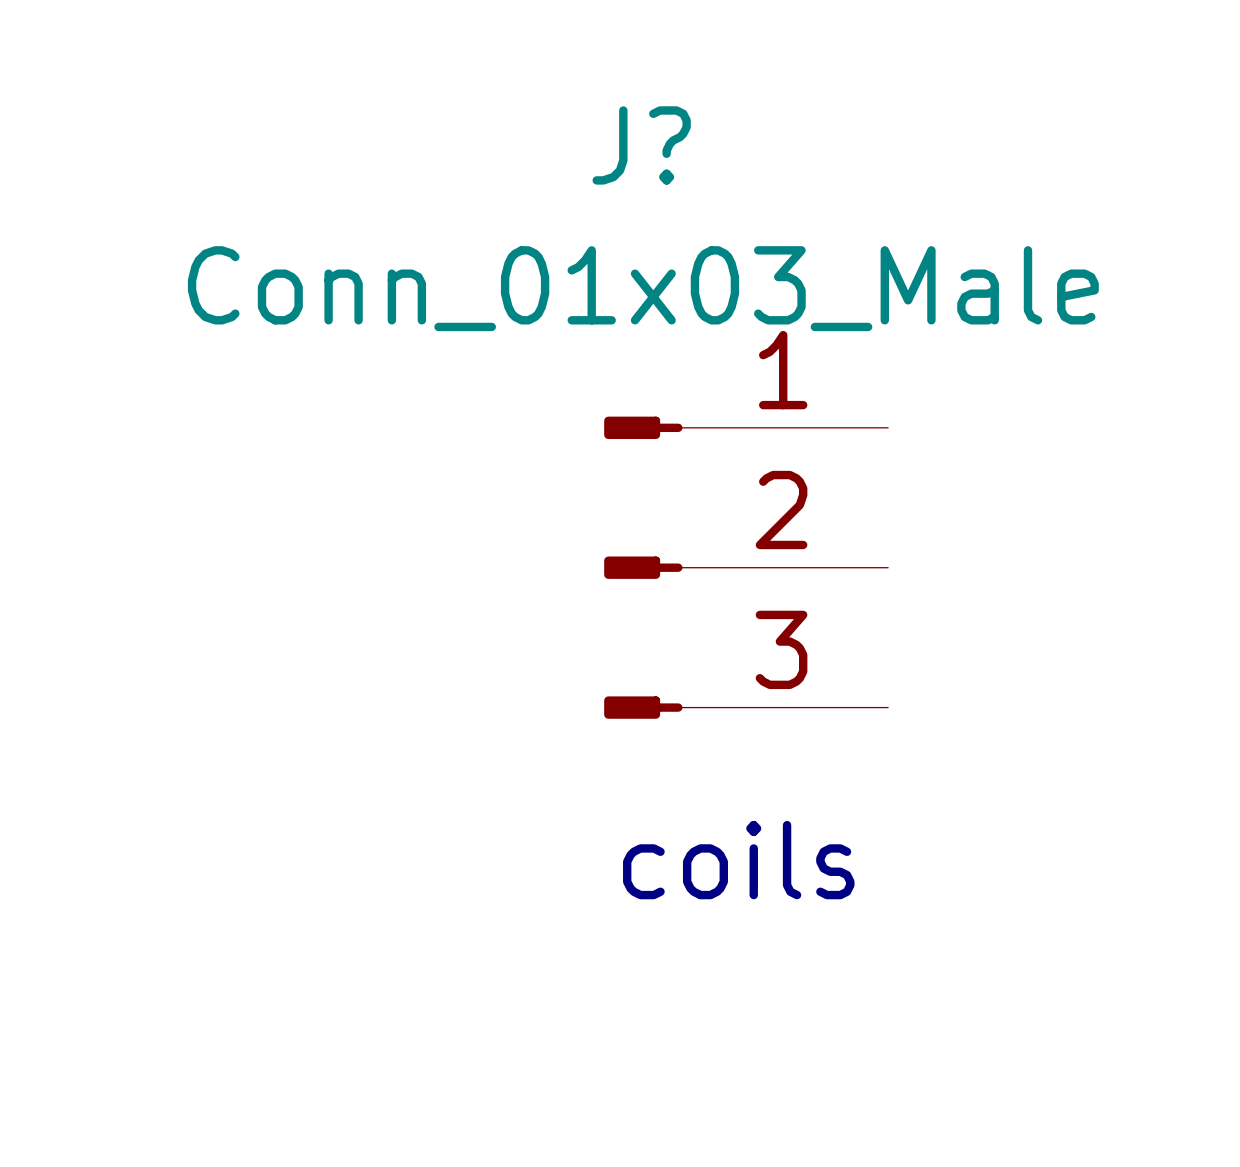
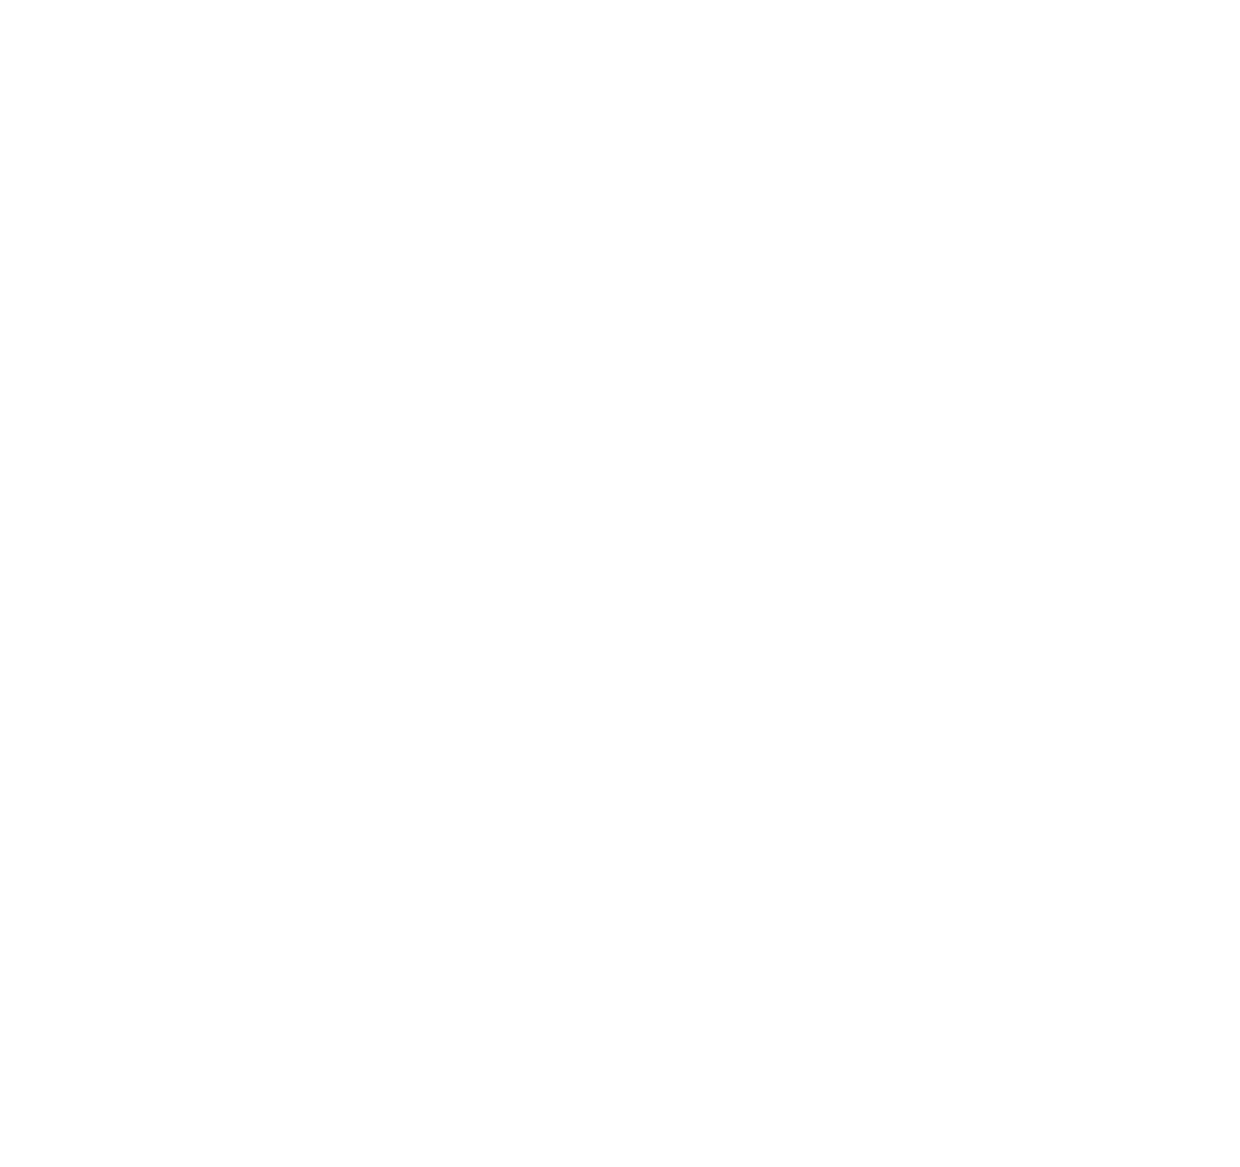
J?: Conn_01x03_Male (746, 567) -> none
text: coils (738, 860) -> none

